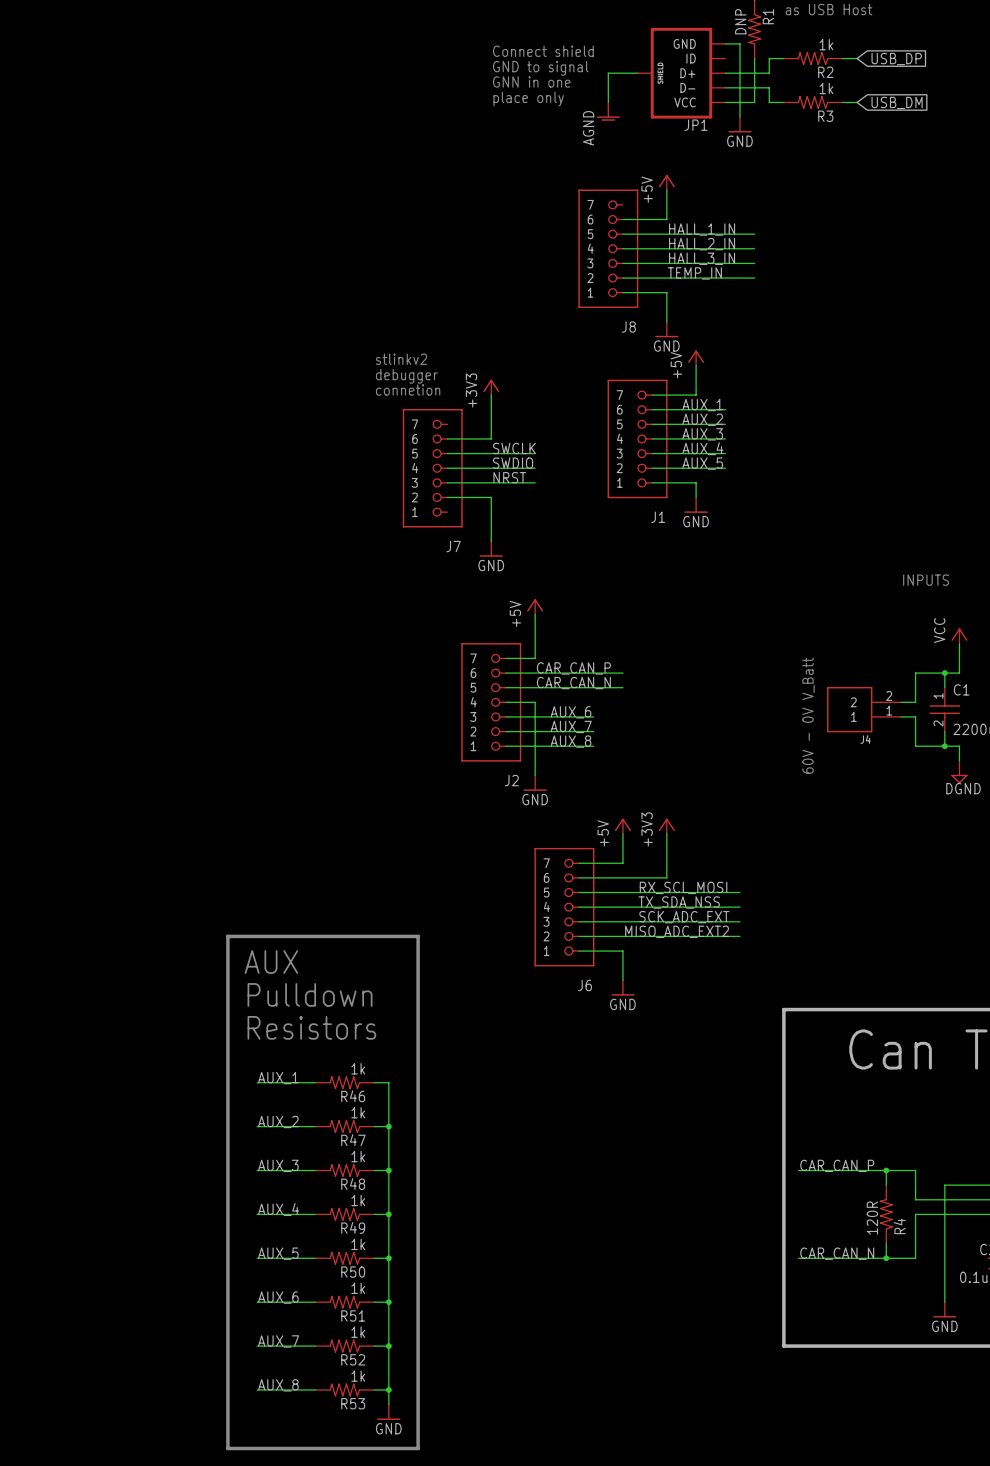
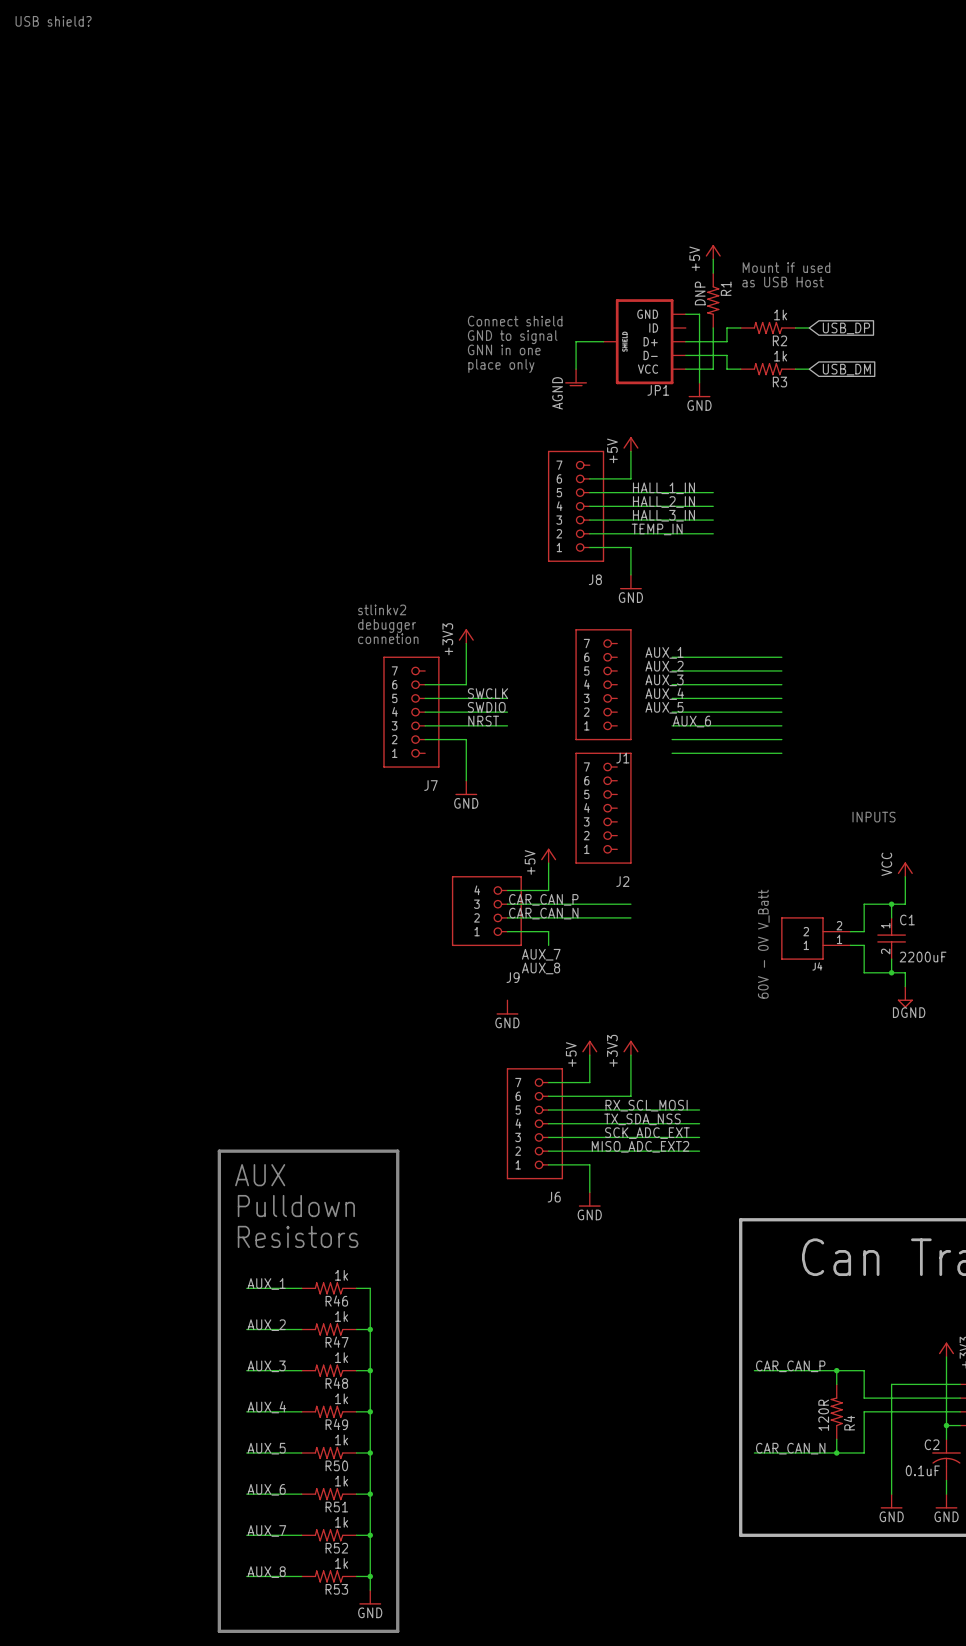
power symbol: +5V (696, 358) -> none
wire: (696, 365) (696, 395) (652, 395) -> none
wire: (652, 409) (710, 409) -> none
wire: none -> (685, 657) (781, 657)
wire: (652, 424) (710, 424) -> none
wire: none -> (685, 670) (781, 670)
wire: (652, 438) (710, 438) -> none
wire: none -> (685, 684) (781, 684)
wire: (652, 453) (710, 453) -> none
wire: none -> (685, 698) (781, 698)
wire: (652, 468) (710, 468) -> none
wire: none -> (685, 712) (781, 712)
label: none -> AUX_6 (691, 721)
wire: (652, 482) (696, 482) (696, 497) -> none
wire: none -> (672, 725) (781, 725)
wire: none -> (672, 739) (781, 739)
power symbol: GND (696, 505) -> none
wire: none -> (672, 753) (781, 753)
power symbol position: +5V (535, 606) -> +5V (548, 855)
wire: (535, 614) (535, 658) (505, 658) -> none
wire: none -> (548, 863) (548, 890) (507, 890)
wire: (505, 673) (535, 673) -> none
wire: none -> (589, 904) (630, 904)
J9: none -> (486, 911)
wire: (505, 687) (535, 687) -> none
wire: none -> (589, 917) (630, 917)
J2 position: (491, 702) -> (603, 808)
wire: (505, 702) (535, 702) (535, 775) -> none
wire: none -> (507, 931) (548, 931) (548, 945)
label: AUX_6 (570, 712) -> none
wire: (505, 731) (593, 731) -> none
wire: (505, 746) (593, 746) -> none

